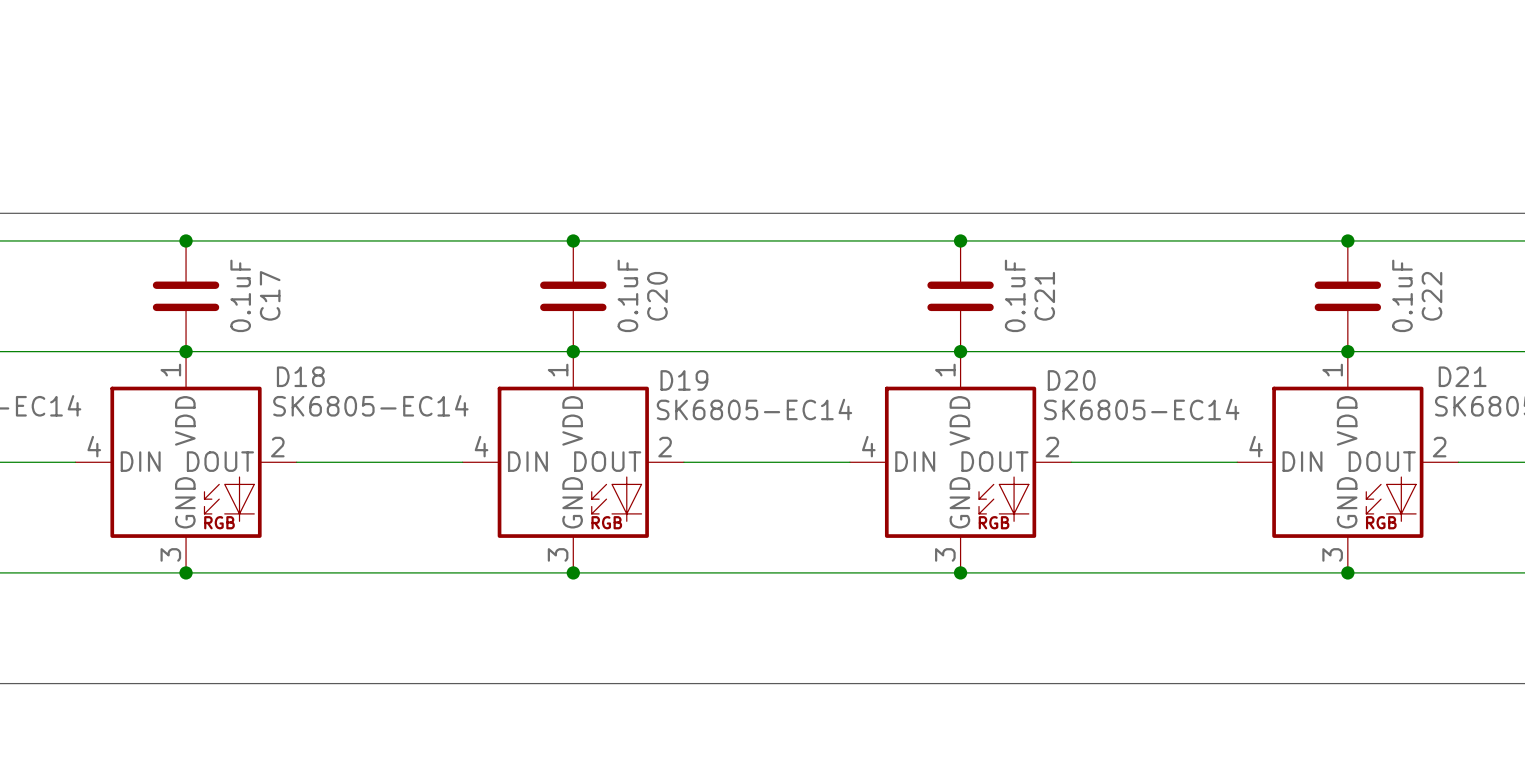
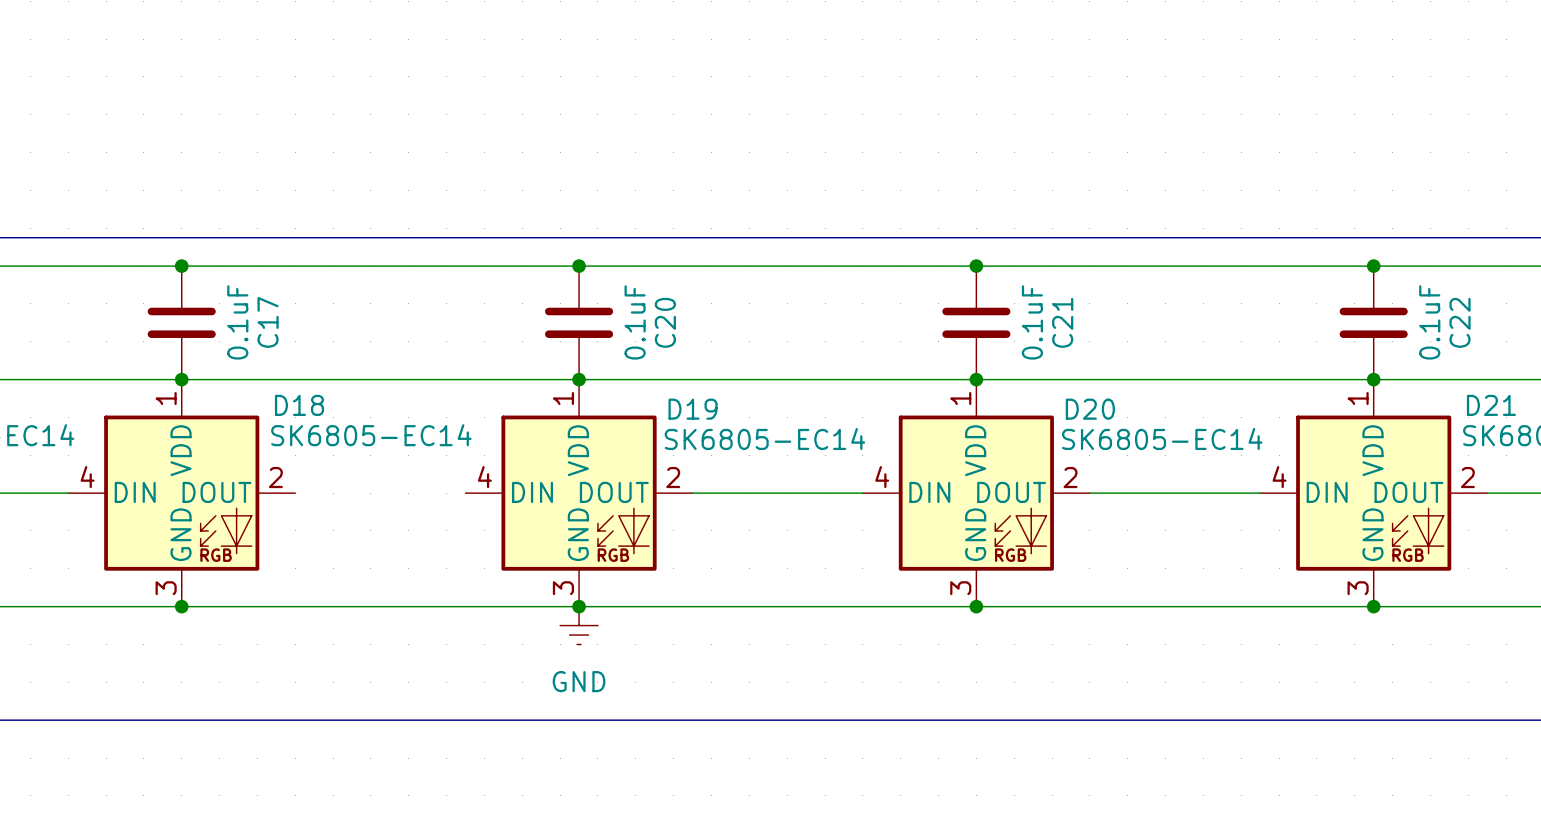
wire: (296, 462) (462, 462) -> none
power symbol: none -> GND (579, 625)

